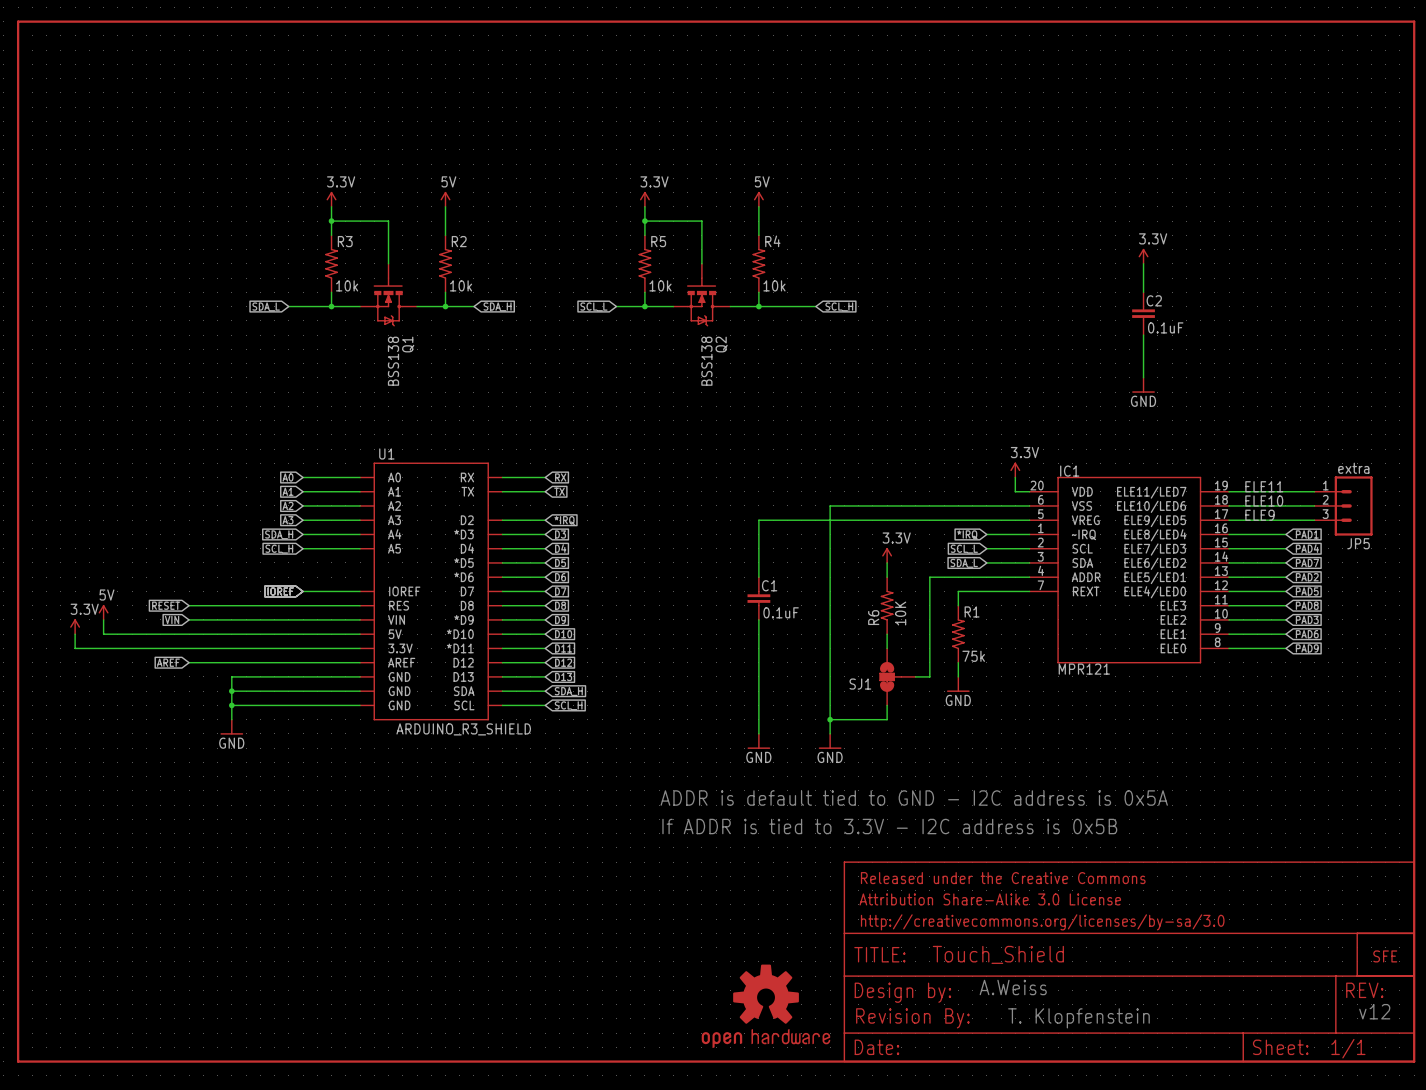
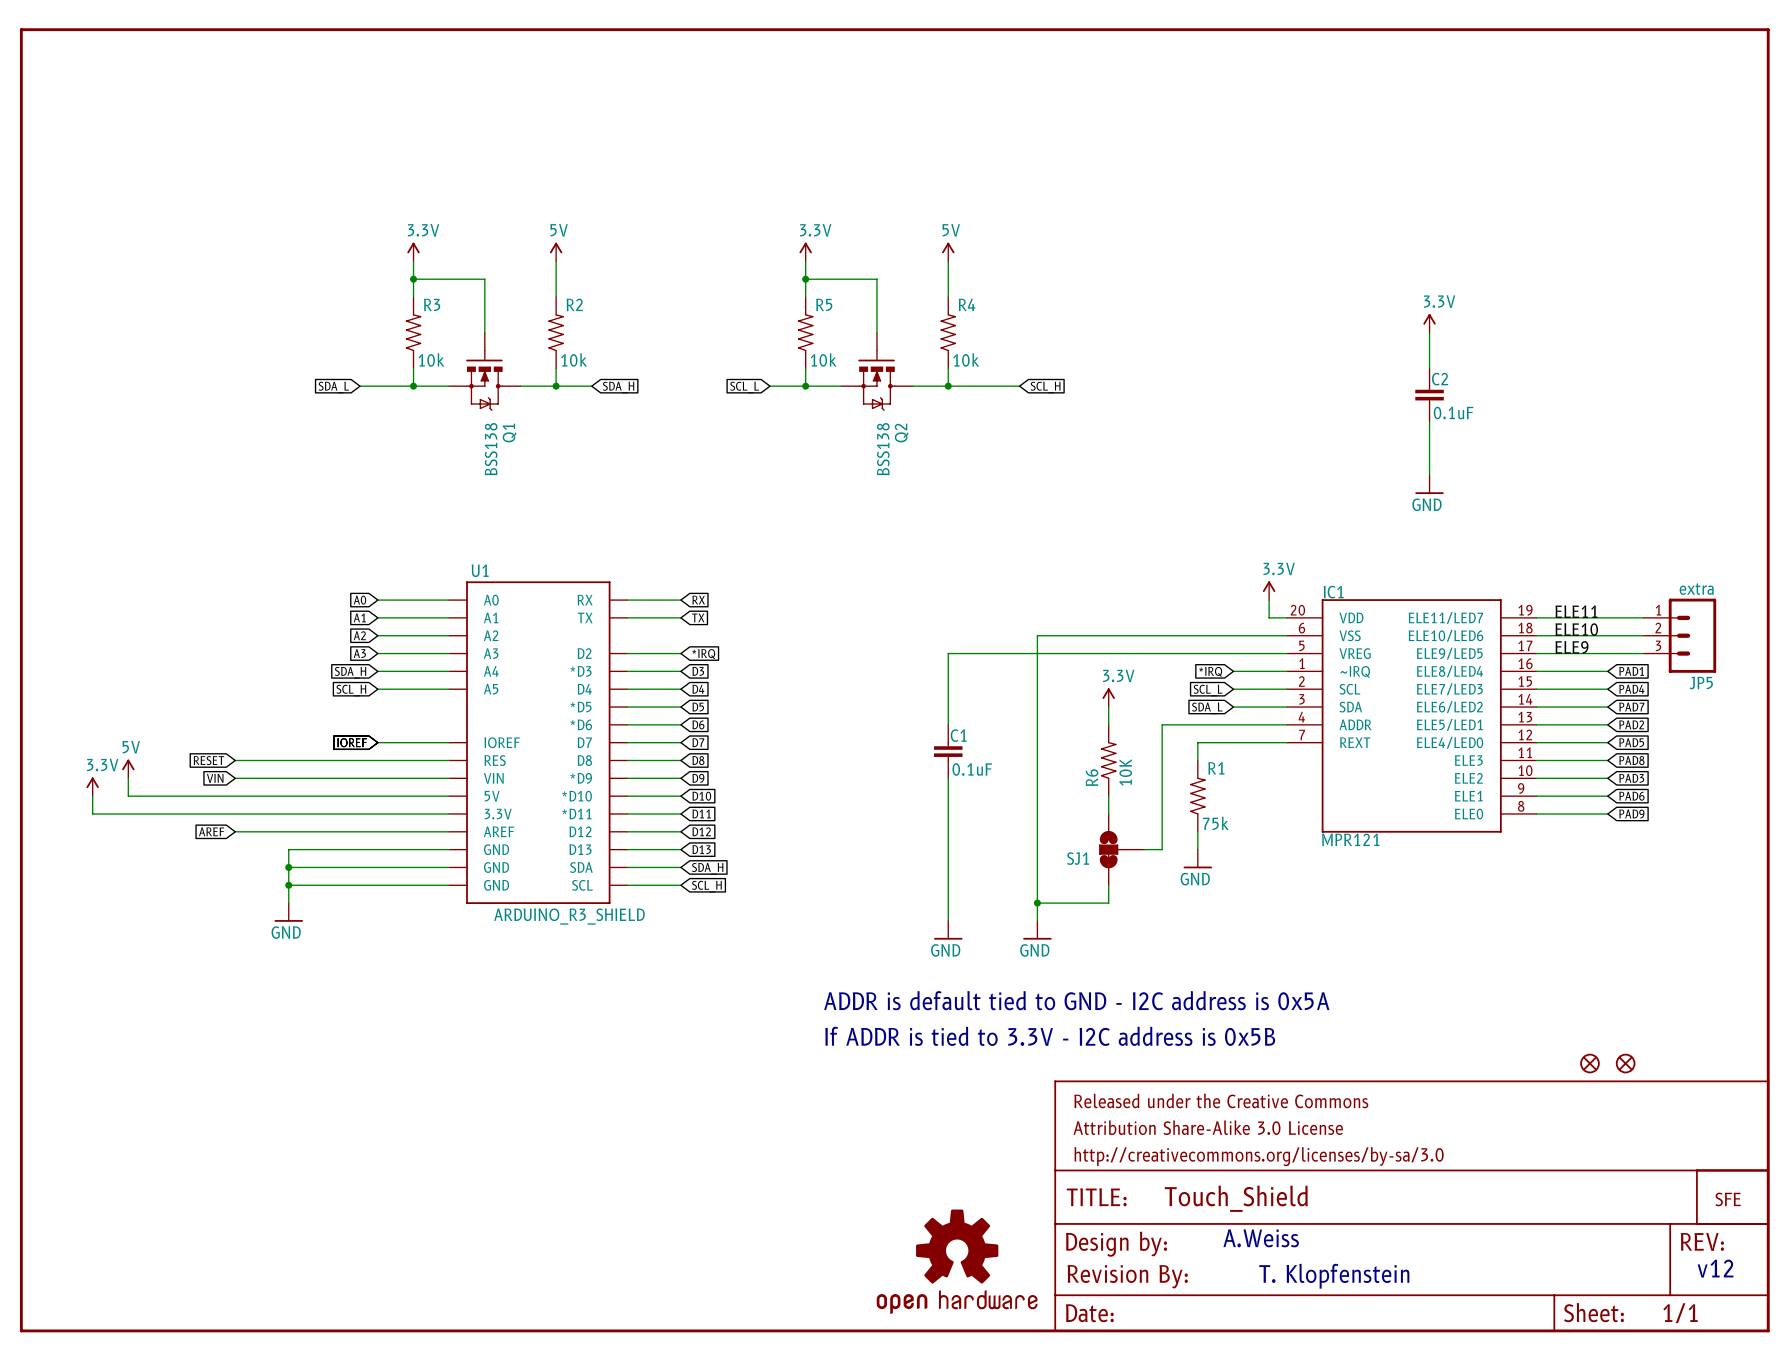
part: none -> (1589, 1063)
part: none -> (1625, 1063)

